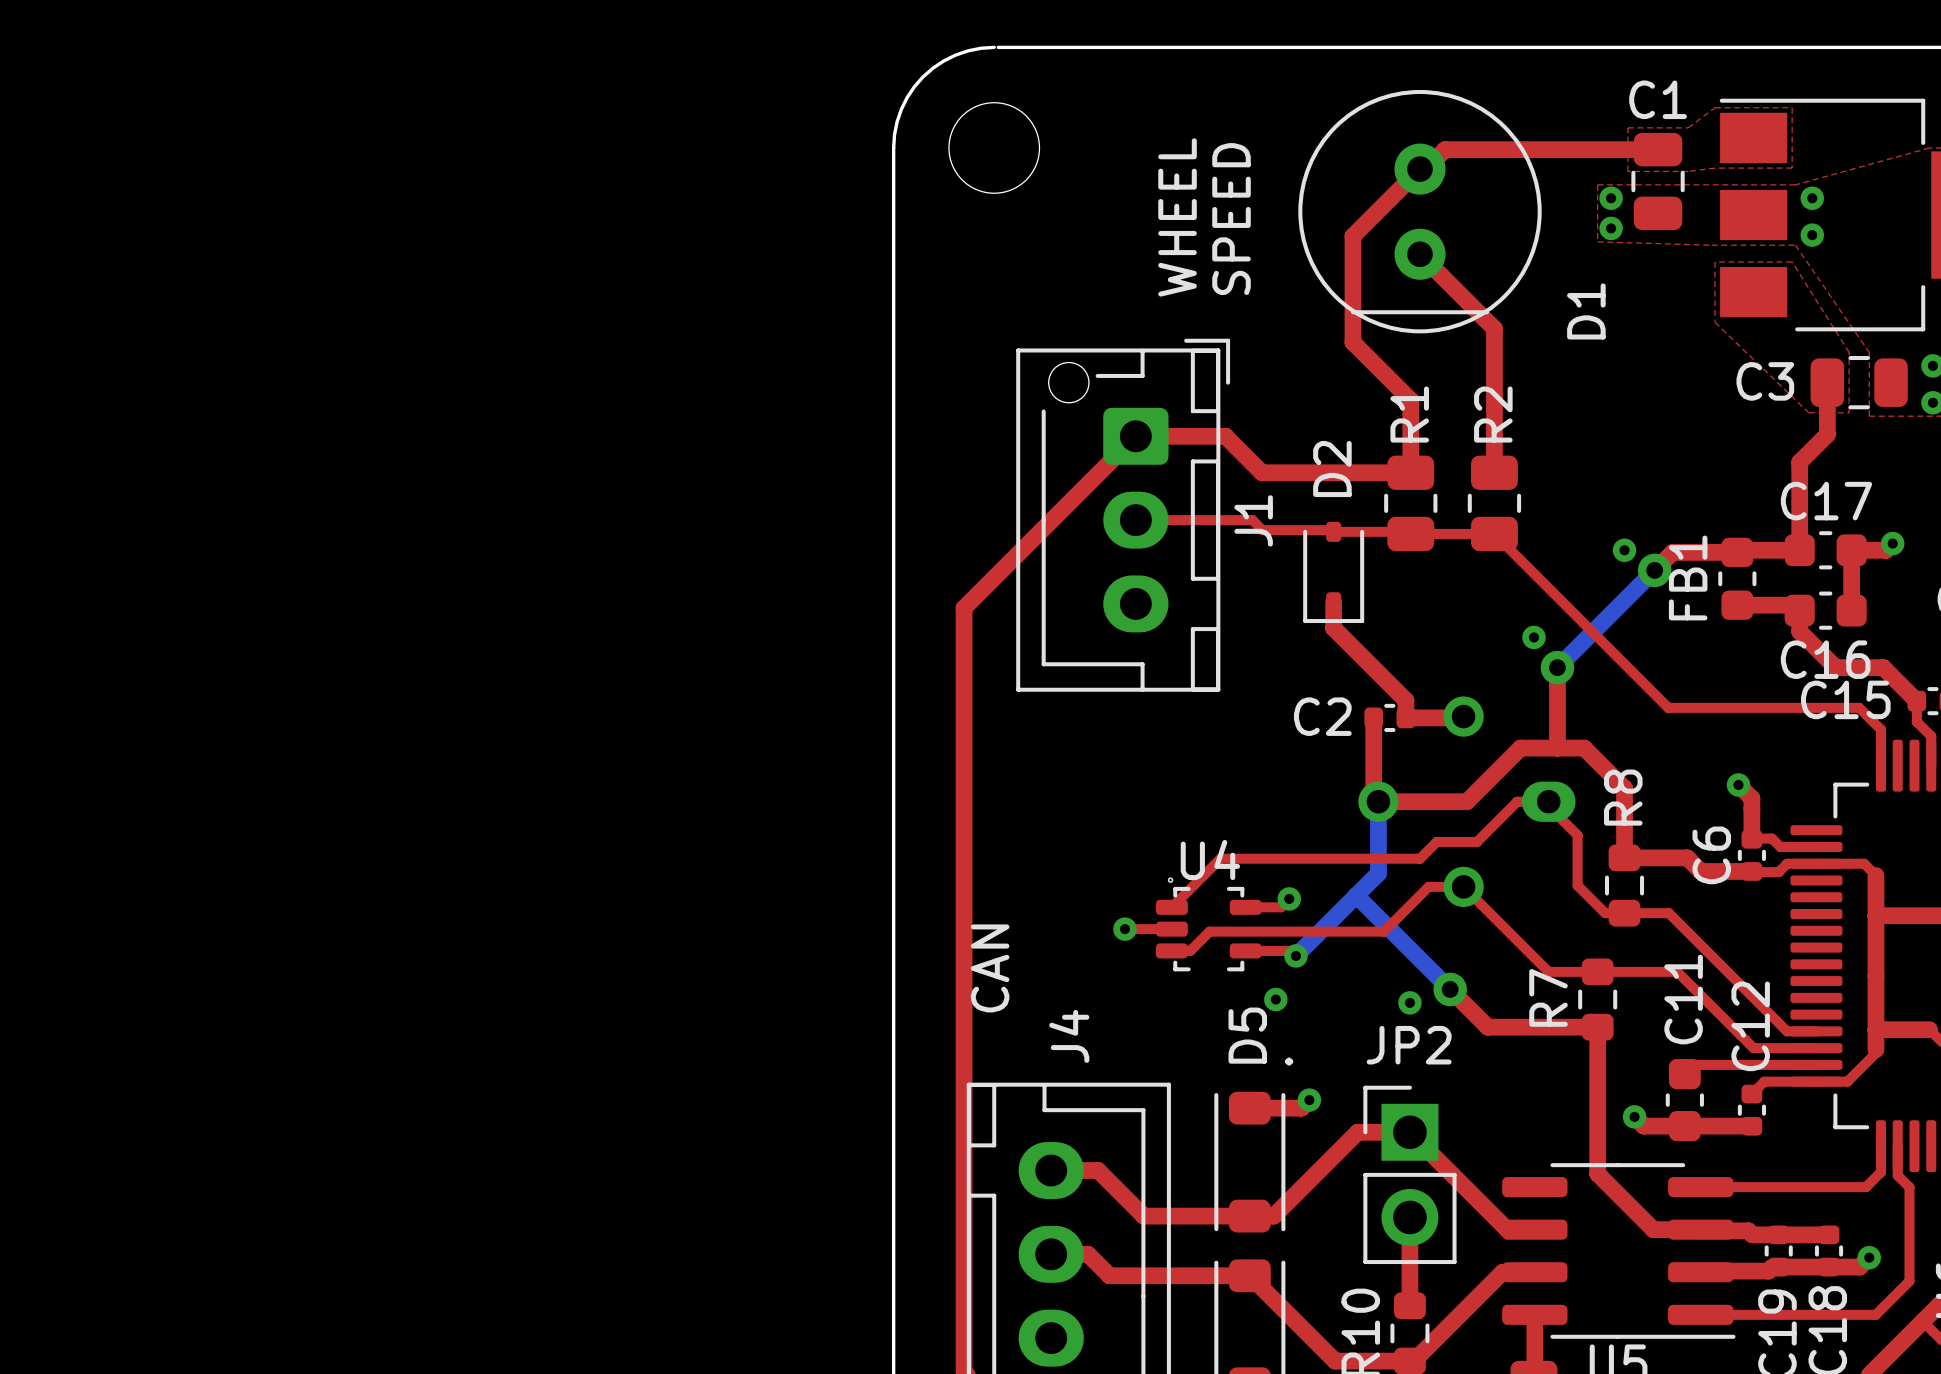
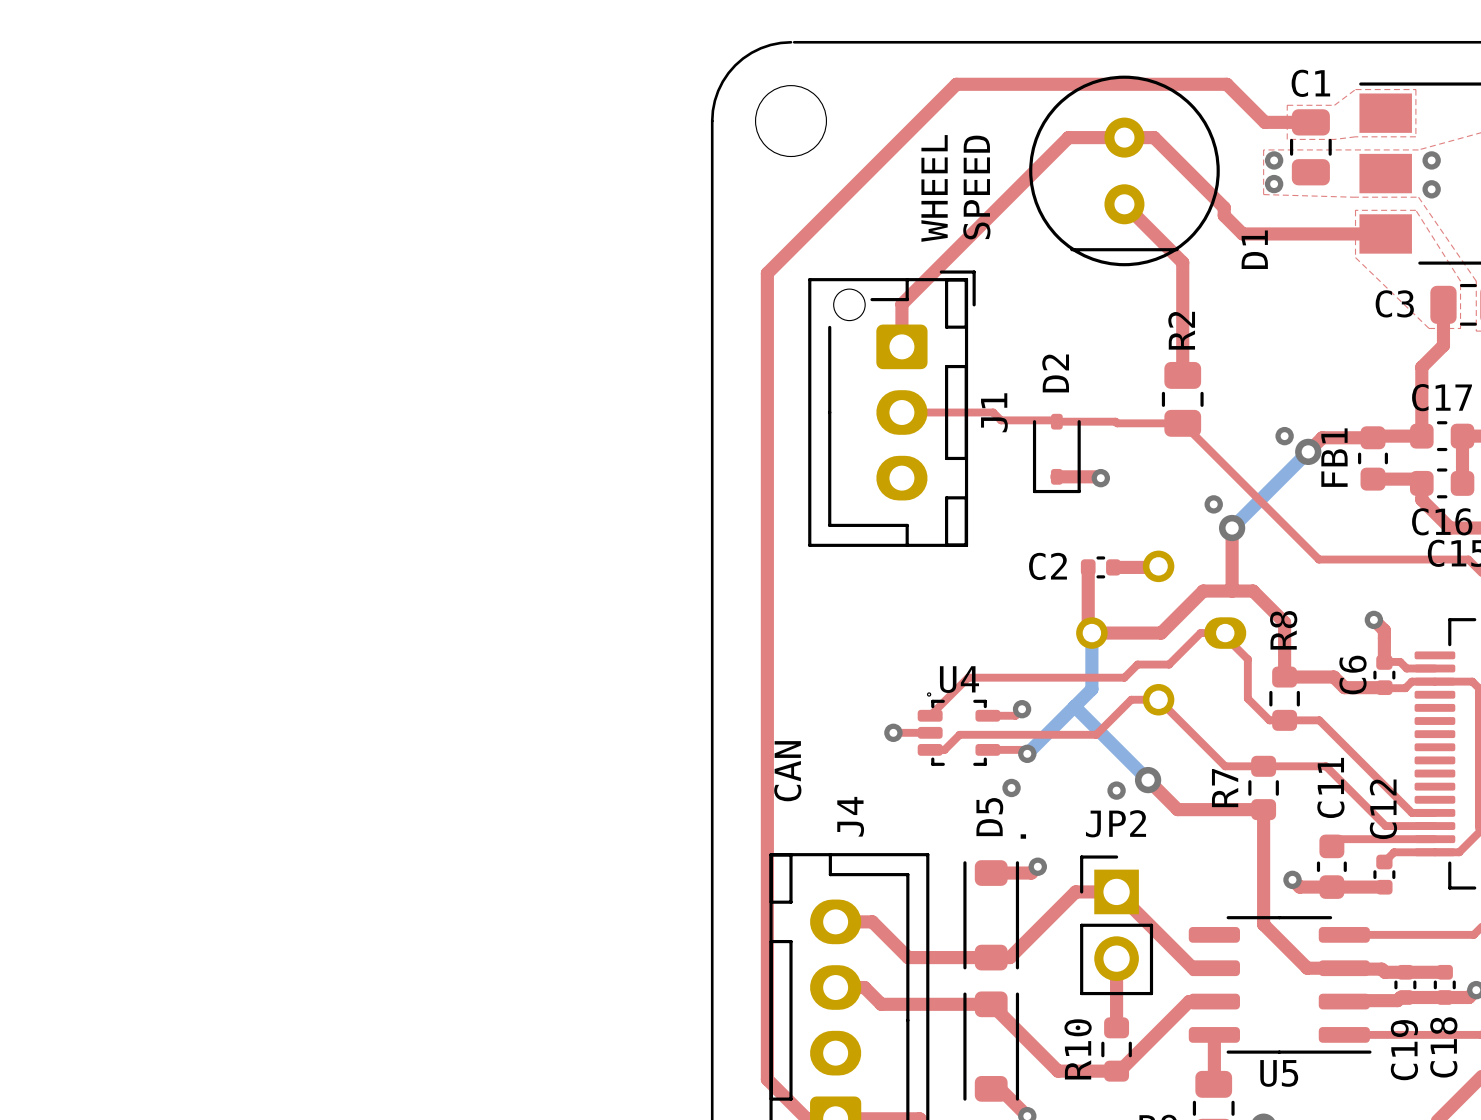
top track: (1599, 149) (1445, 149) (1425, 169) -> (1385, 233) (1242, 233) (1224, 215) (1224, 207) (1154, 137) (1128, 137)
top track: (1420, 169) (1352, 236) (1352, 342) (1410, 400) (1410, 472) (1262, 472) (1225, 436) (1135, 436) (964, 608) -> (1264, 122) (1226, 84) (956, 84) (767, 273) (767, 481)
top track: none -> (1124, 137) (1068, 137) (901, 304) (901, 346)
R1: (1410, 503) -> none
top track: (1333, 602) (1333, 628) (1405, 700) (1405, 717) -> (1056, 476) (1100, 478)
via: none -> (1100, 478)

